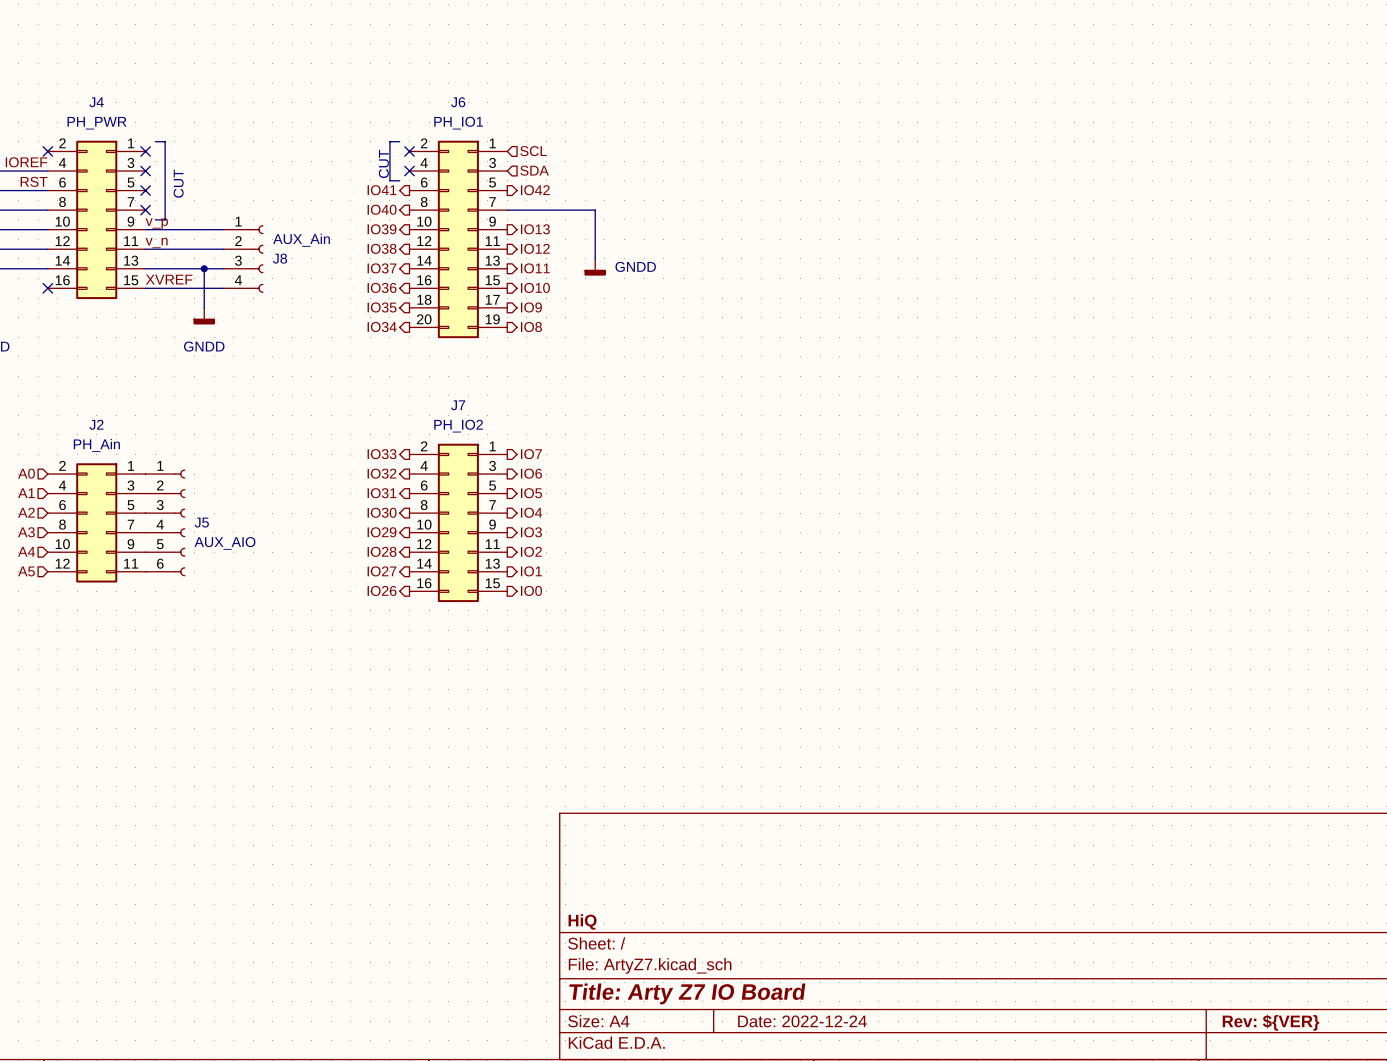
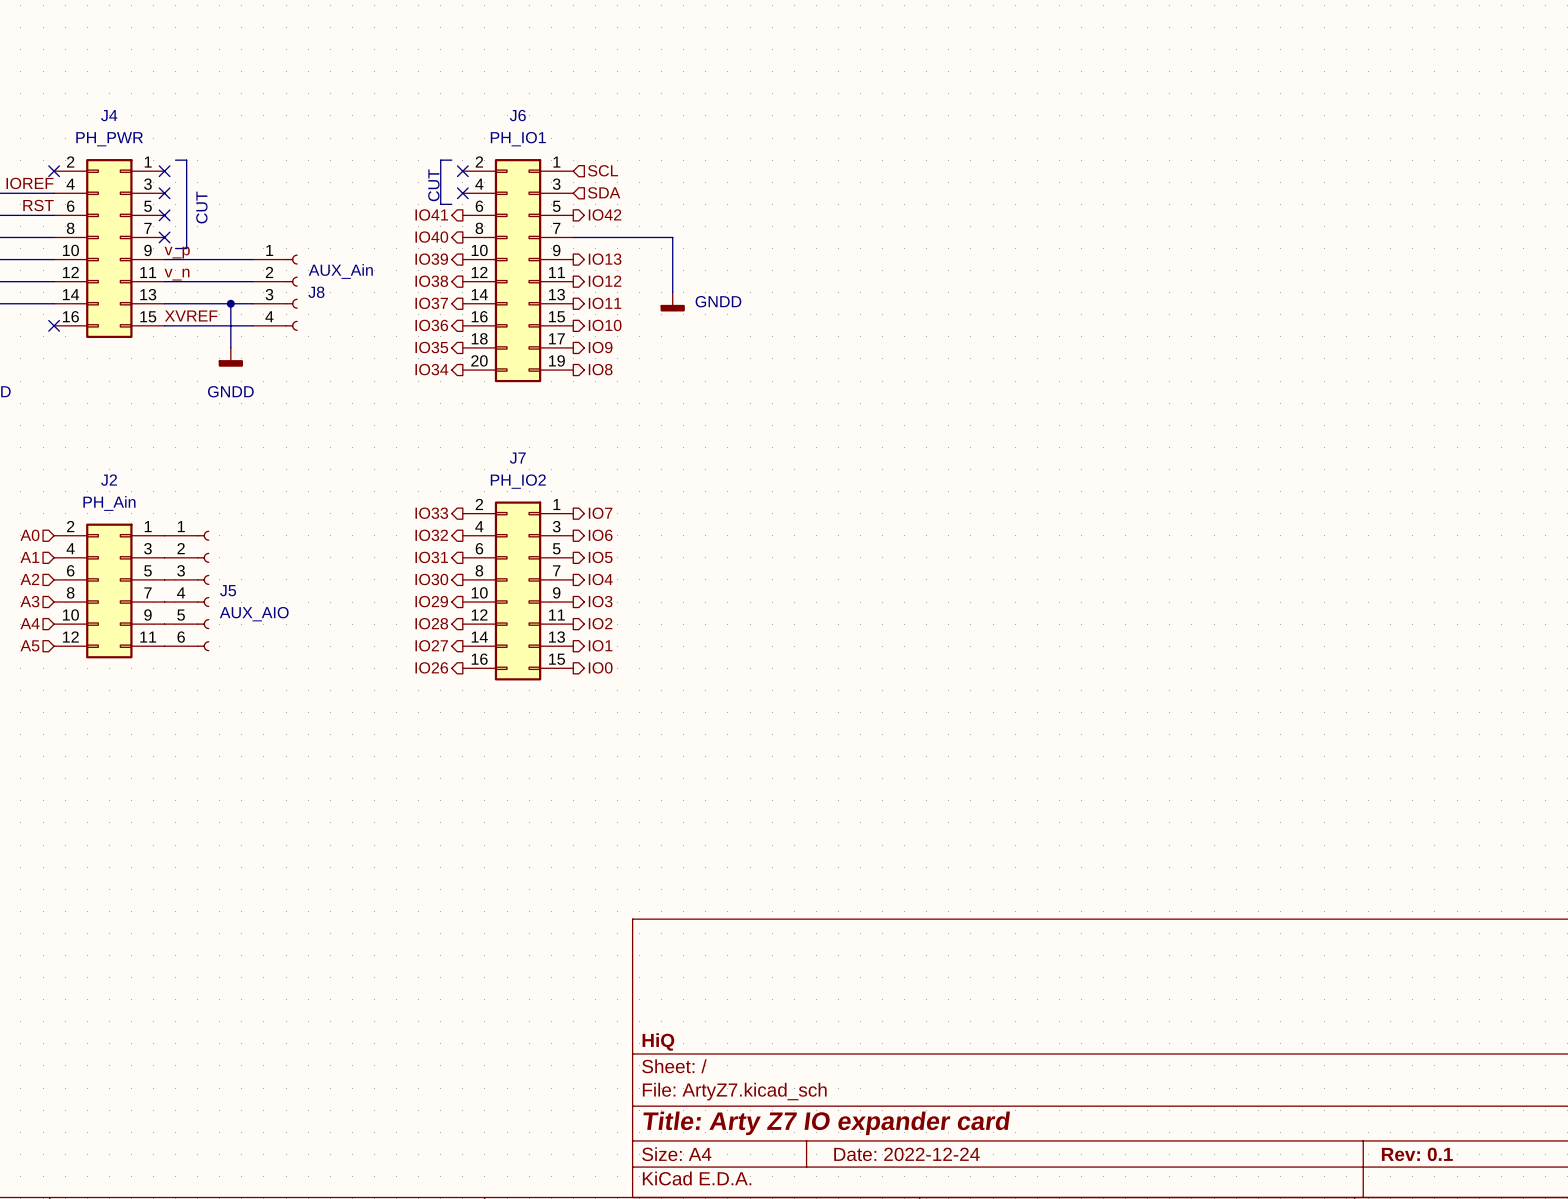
title block: Title: Arty Z7 IO Board (687, 993) -> Title: Arty Z7 IO expander card (826, 1123)
title block: Rev: ${VER} (1271, 1022) -> Rev: 0.1 (1417, 1154)

